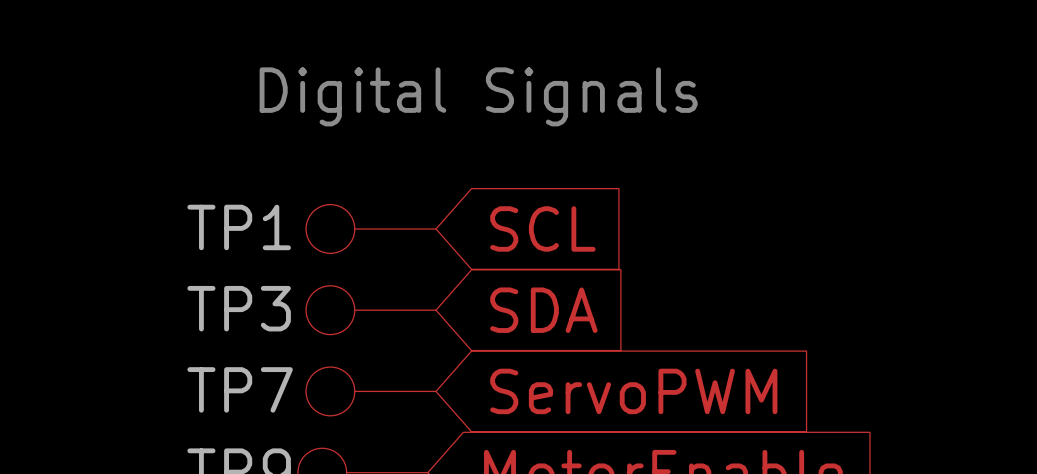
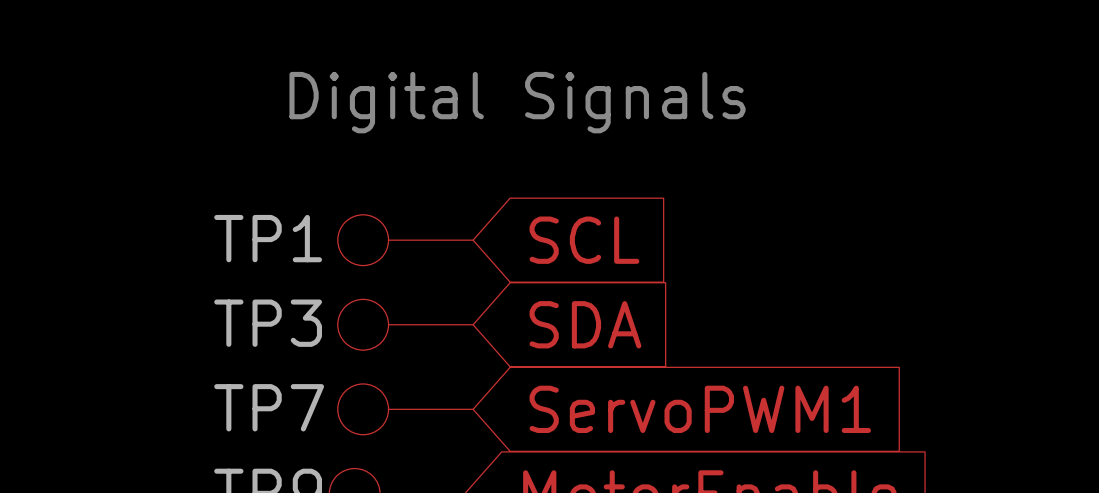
global label: ServoPWM (633, 391) -> ServoPWM1 (700, 409)

